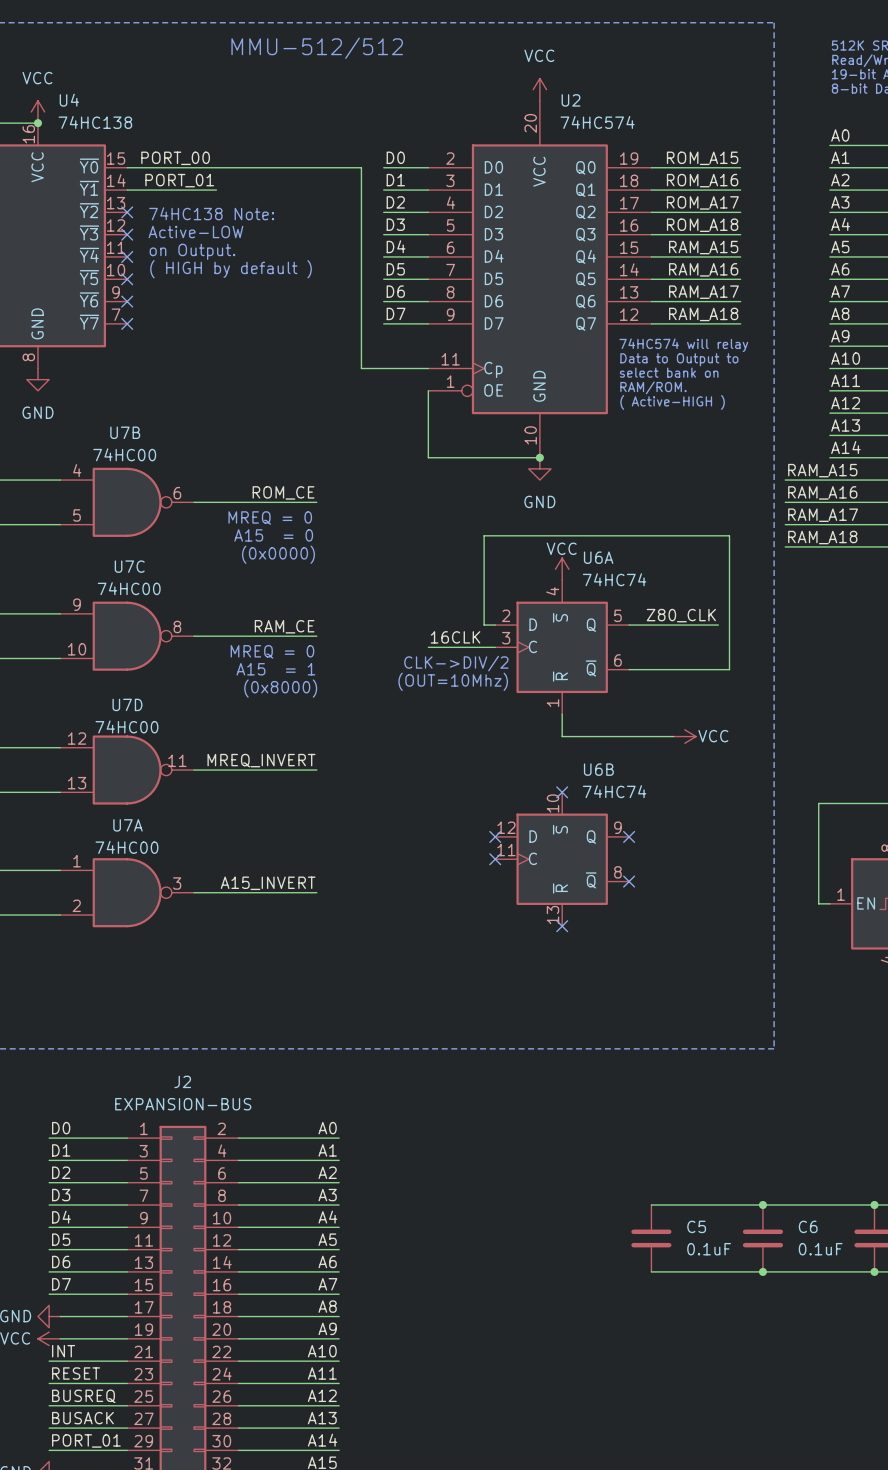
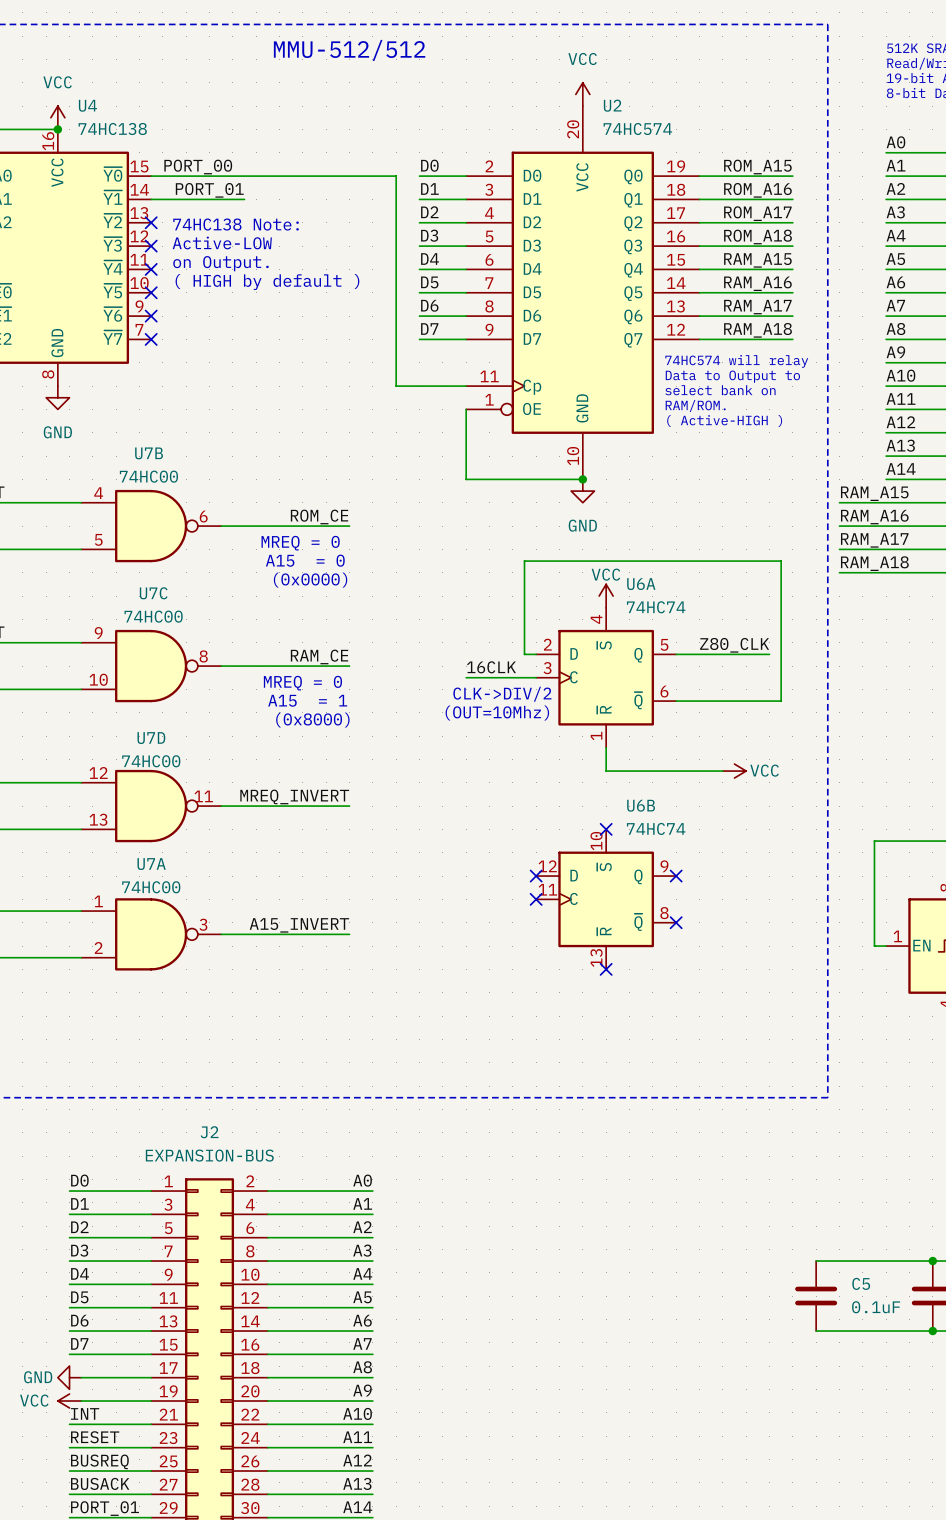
wire: (651, 1205) (762, 1205) -> none
junction: (762, 1205) -> none
C6 name: C6 (808, 1226) -> C5 (861, 1283)
C5: 0.1uF (651, 1238) -> none
wire: (651, 1271) (762, 1271) -> none
junction: (762, 1271) -> none

